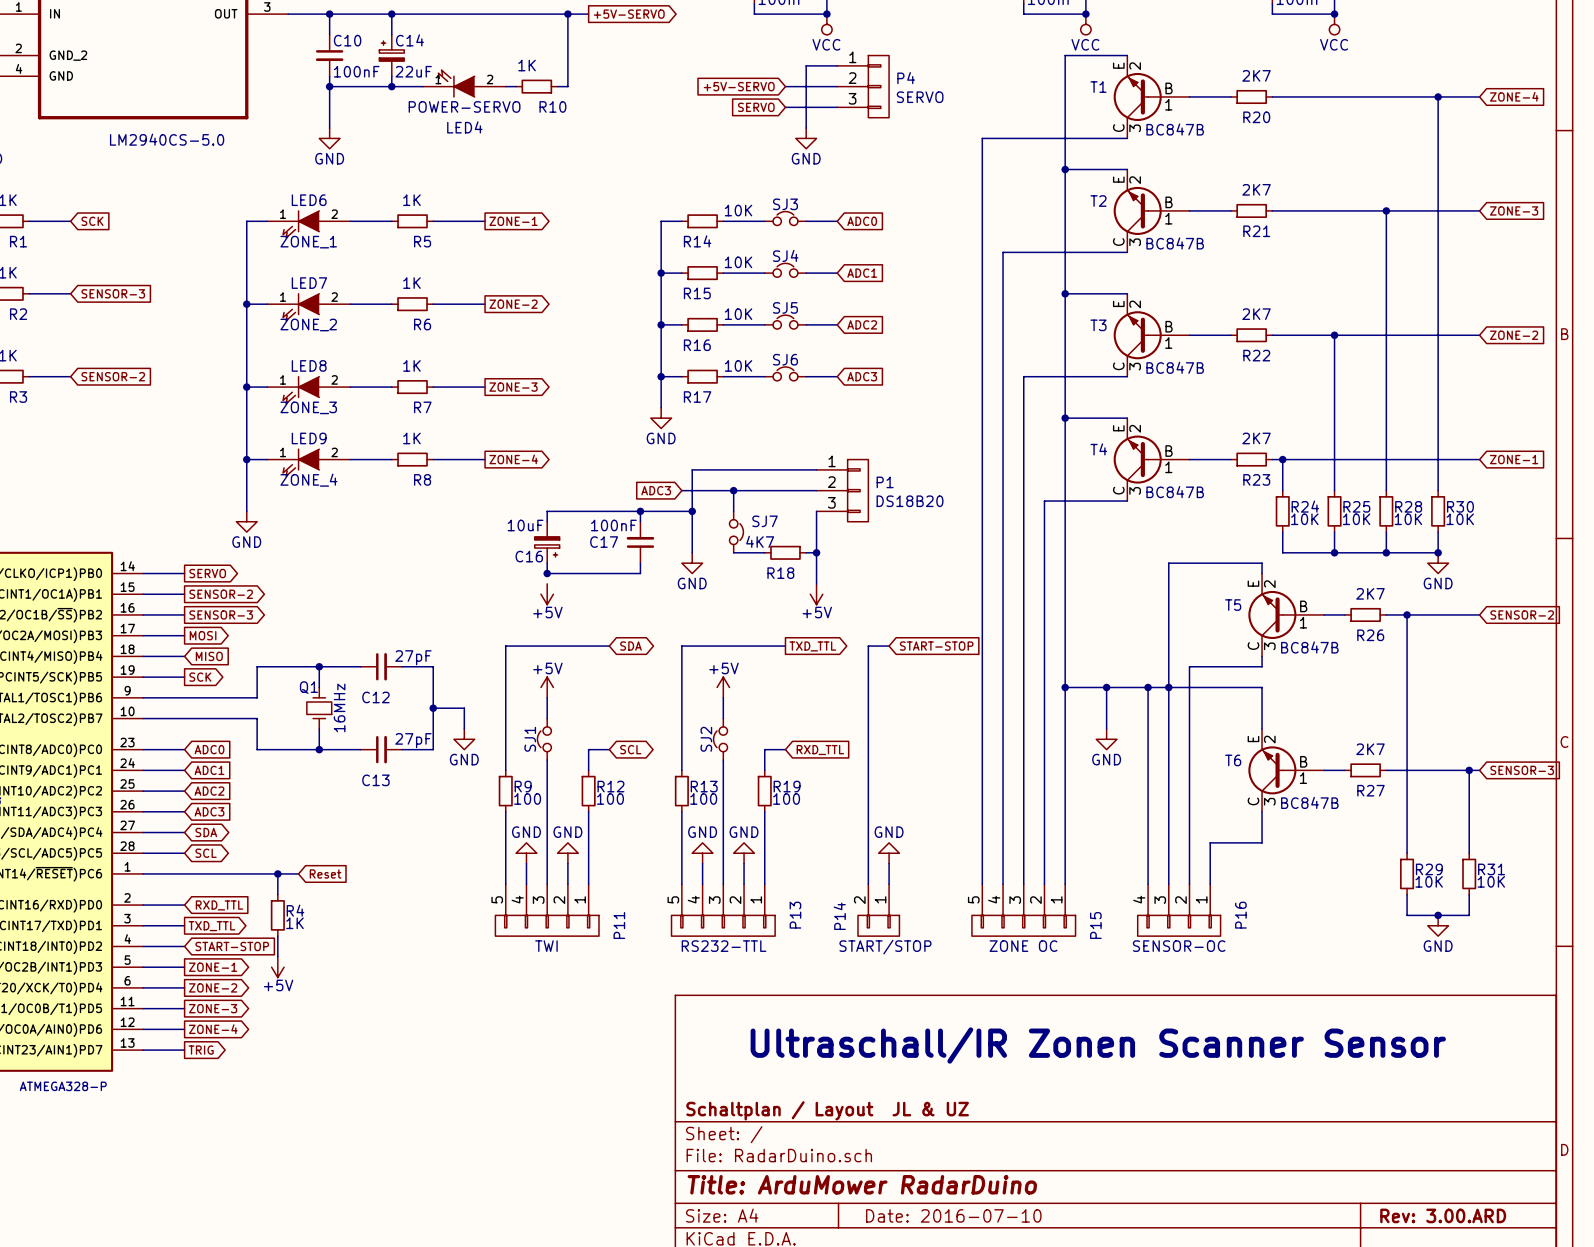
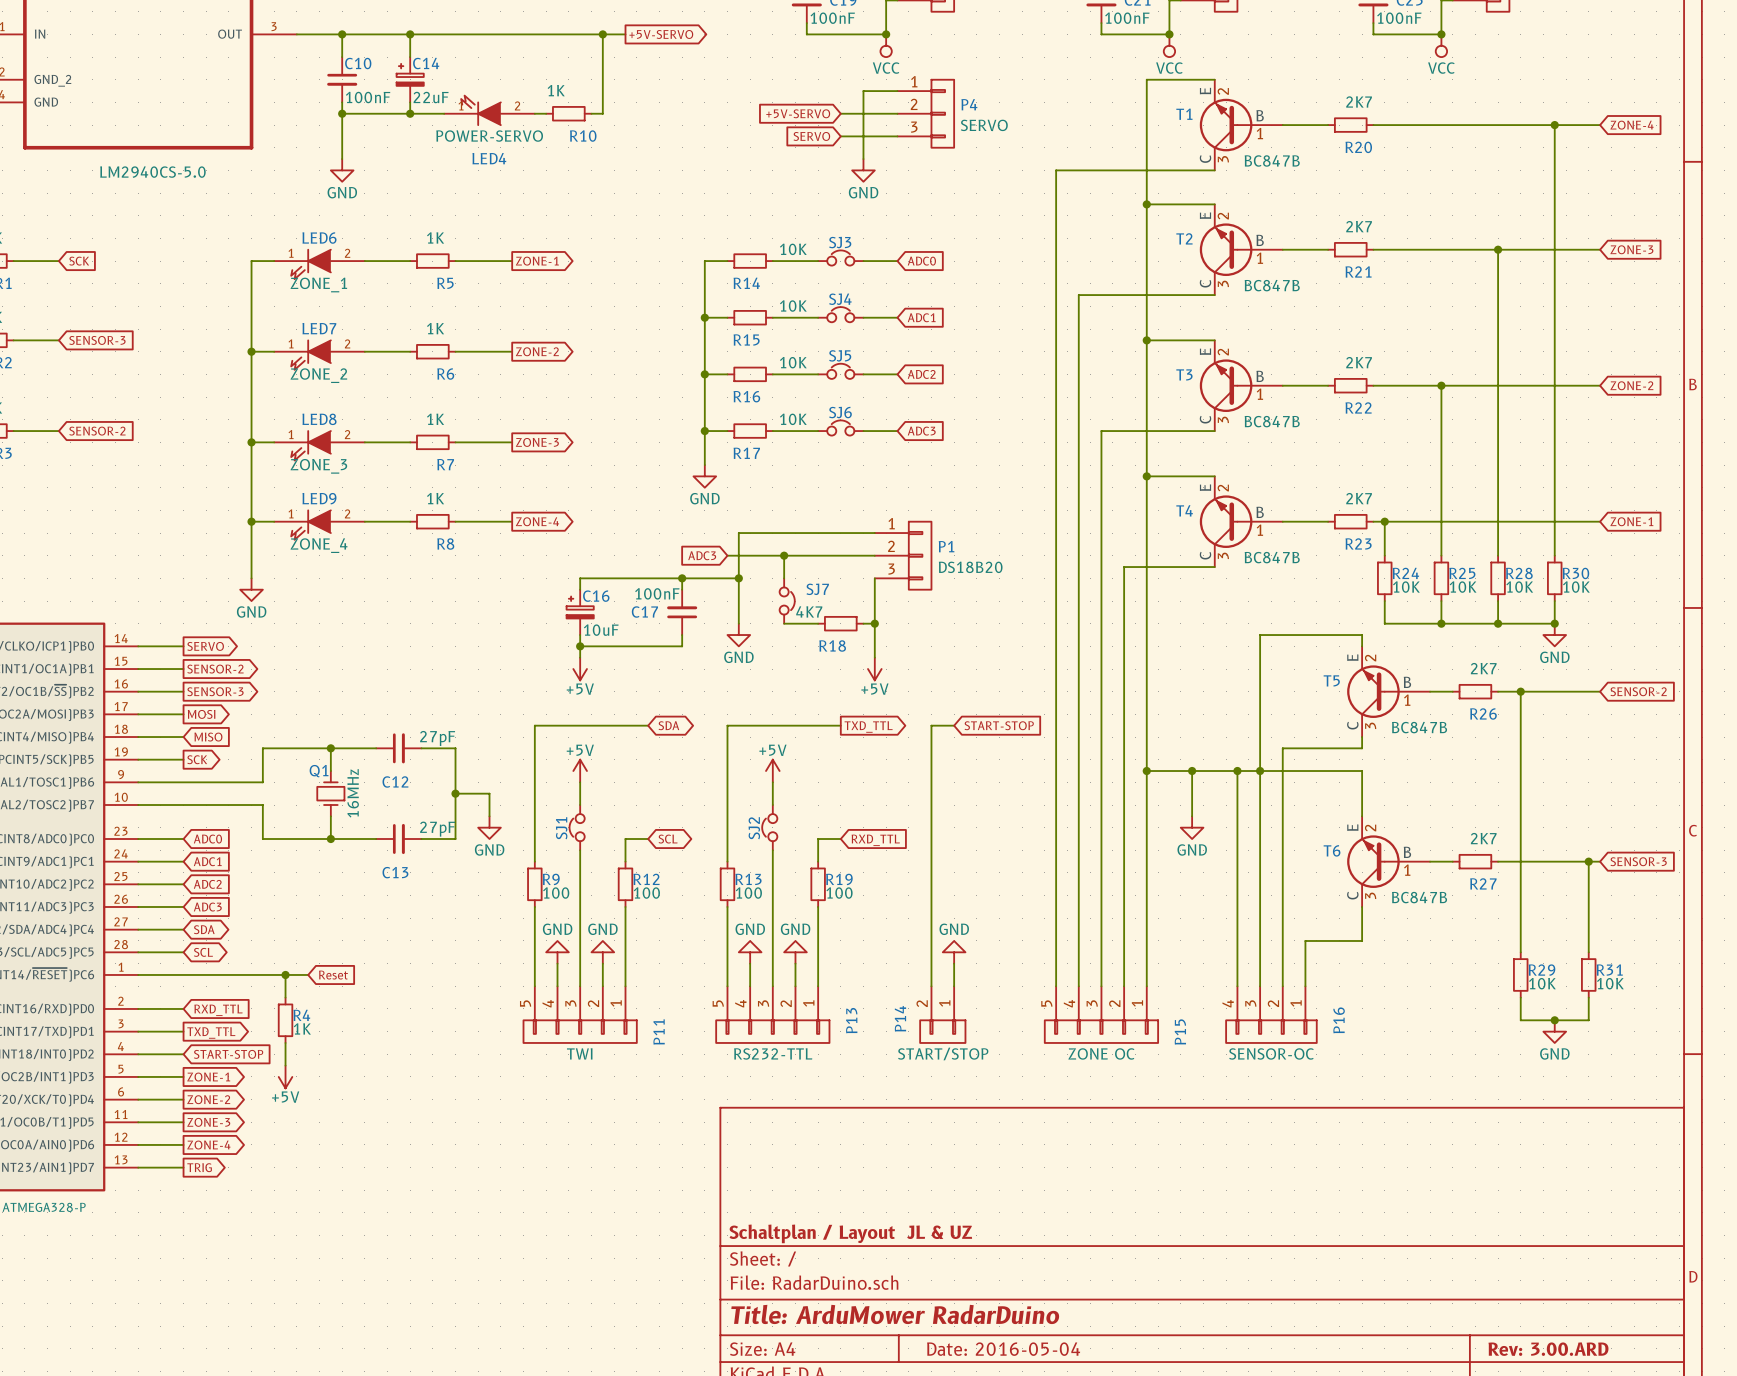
C16 rotation: 0° (547, 546) -> 180° (580, 607)
wire: none -> (580, 646) (580, 657)
text: Ultraschall/IR Zonen Scanner Sensor (1098, 1045) -> none
title block: Date: 2016-07-10 (953, 1215) -> Date: 2016-05-04 (1003, 1349)

